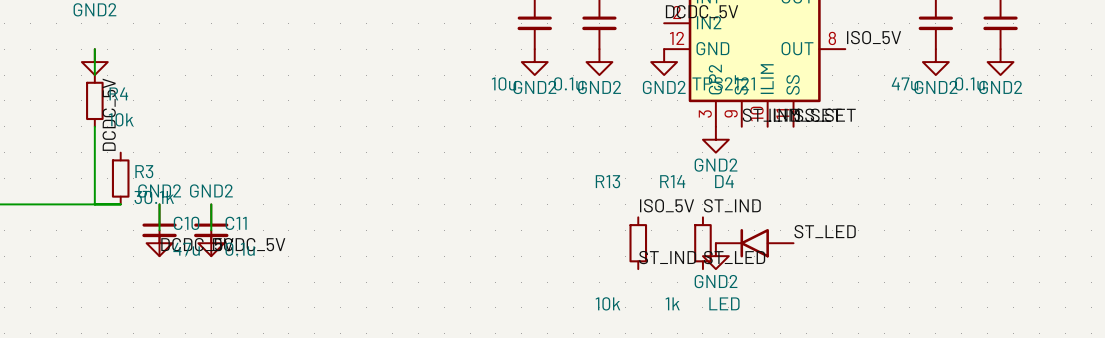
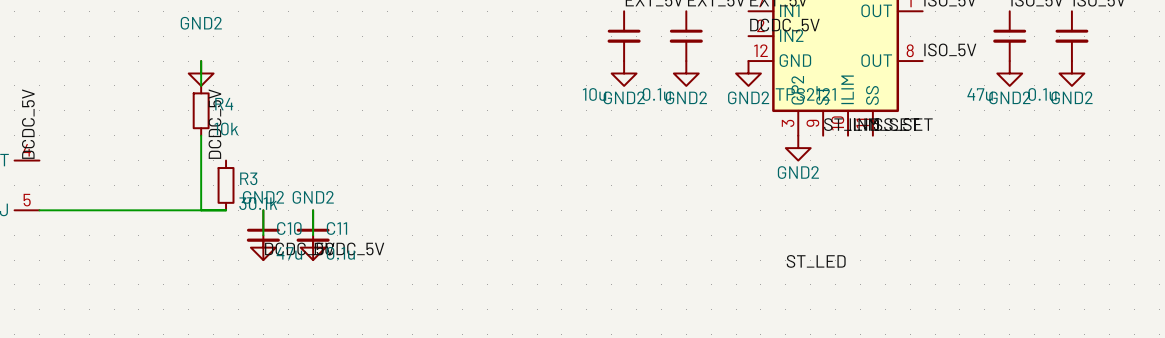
label: ISO_5V (667, 205) -> none
label: ST_IND (732, 205) -> none
label: ST_LED (825, 231) -> none
R13: 10k (638, 243) -> none
R14: 1k (702, 243) -> none
D4: LED (754, 243) -> none
power symbol: GND2 (715, 256) -> none
label: ST_IND (667, 257) -> none

